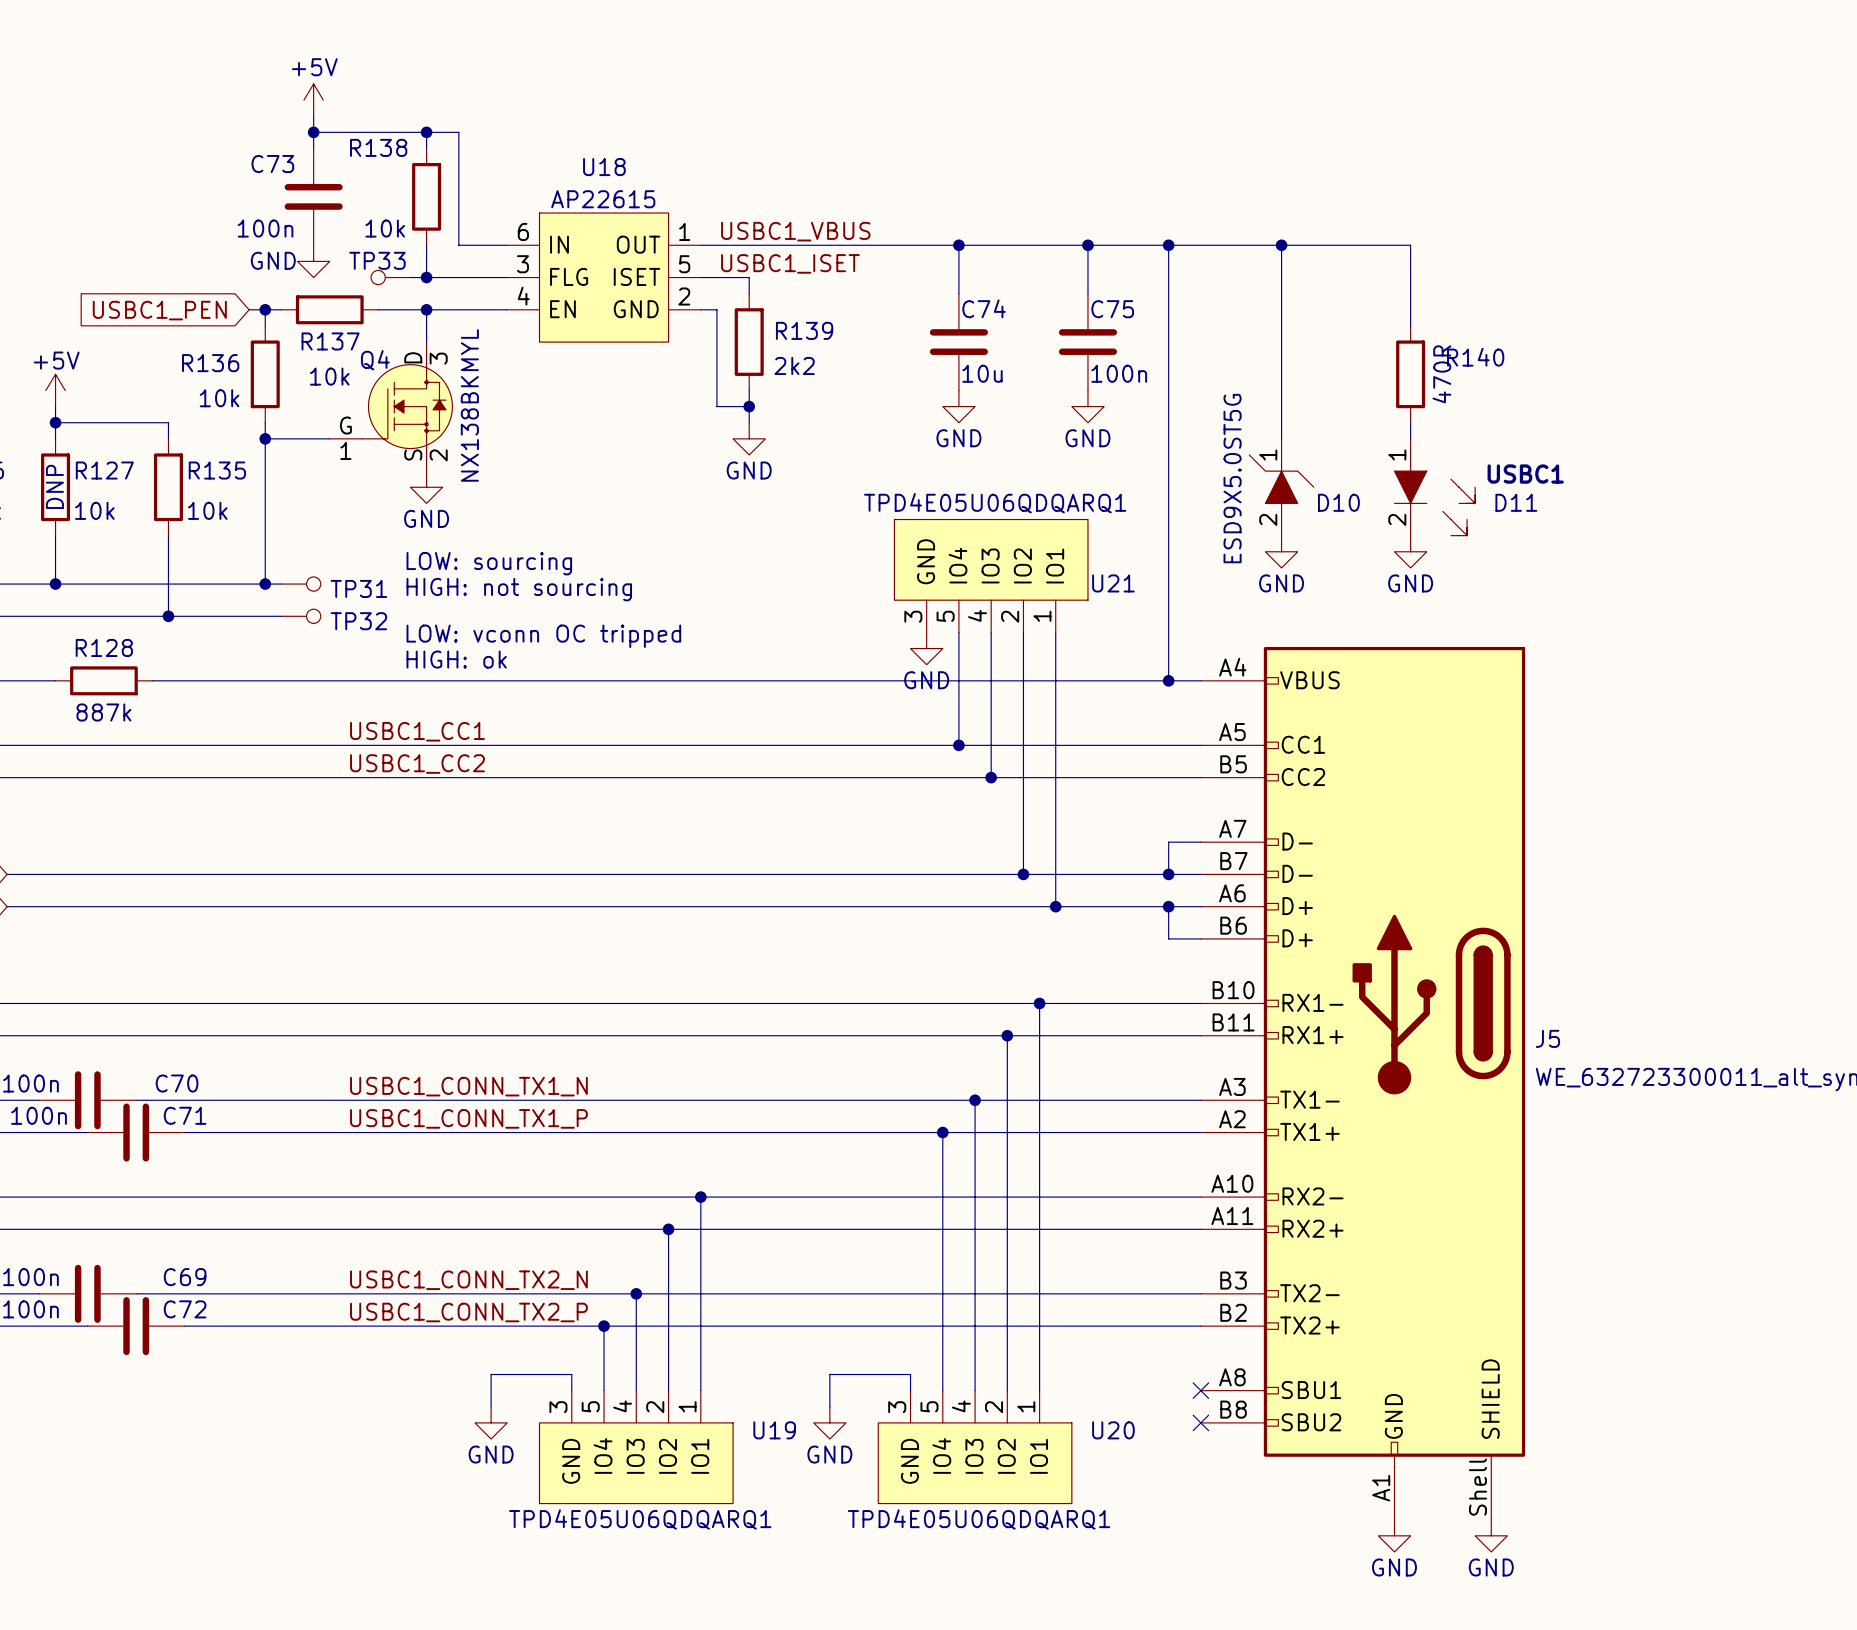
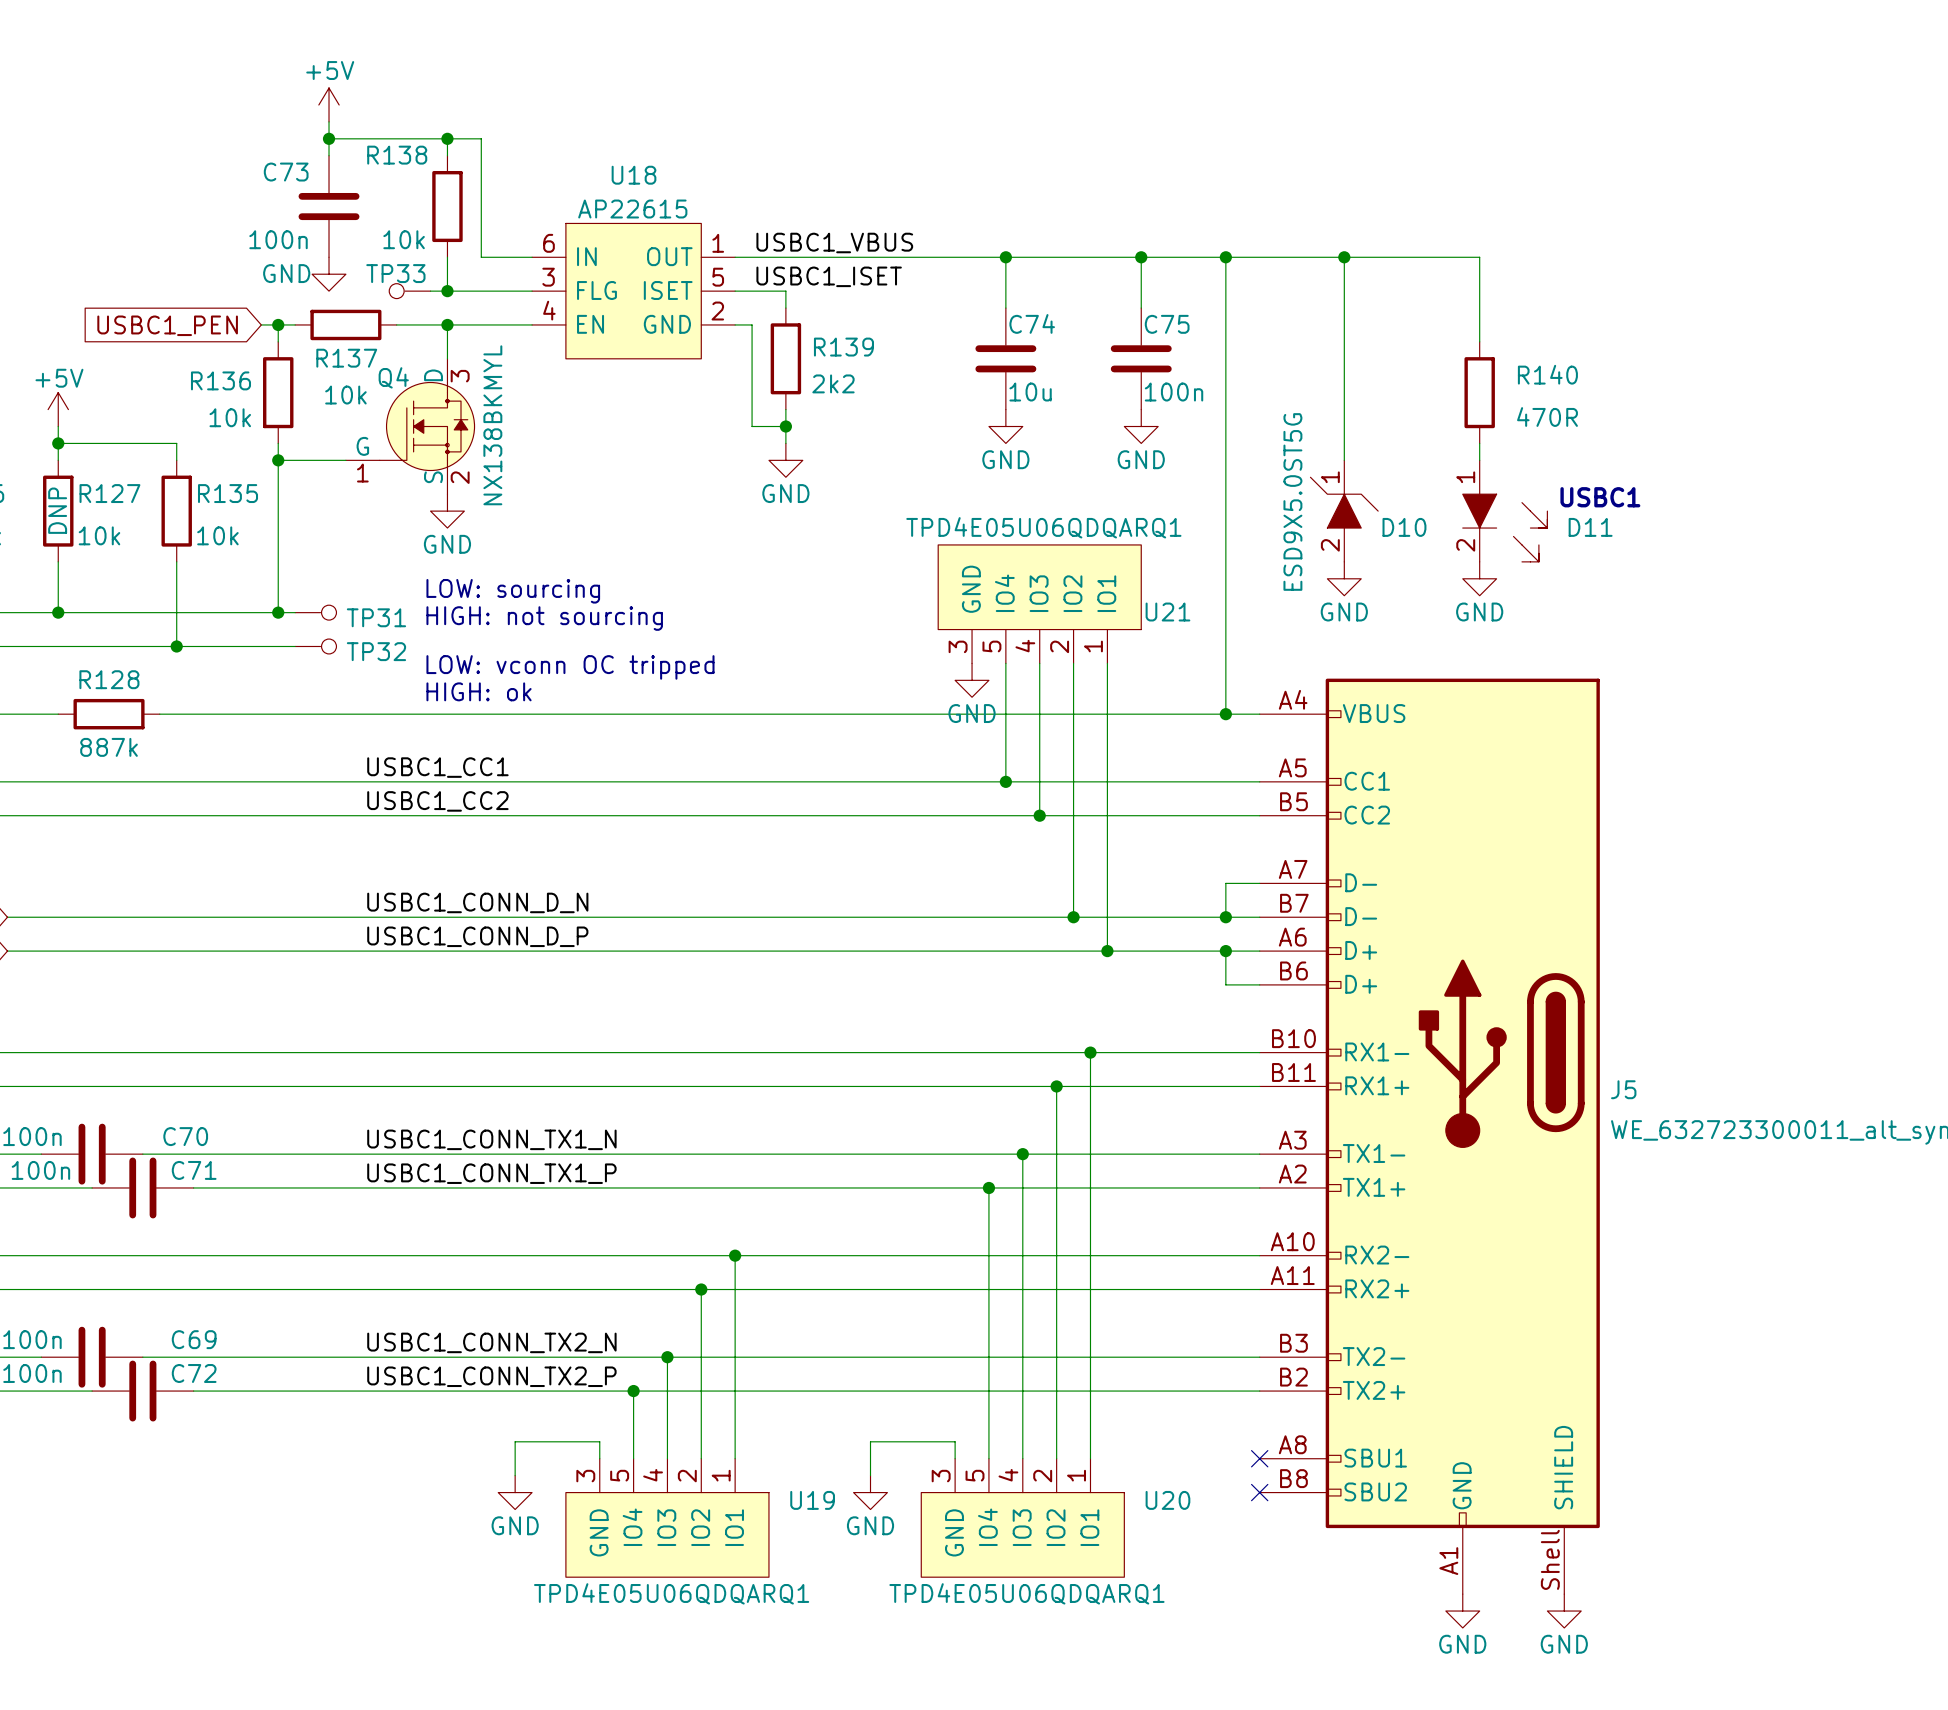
R140 text rotation: 0° (1441, 374) -> 90° clockwise (1547, 417)
label: none -> USBC1_CONN_D_N (477, 902)
label: none -> USBC1_CONN_D_P (477, 936)

